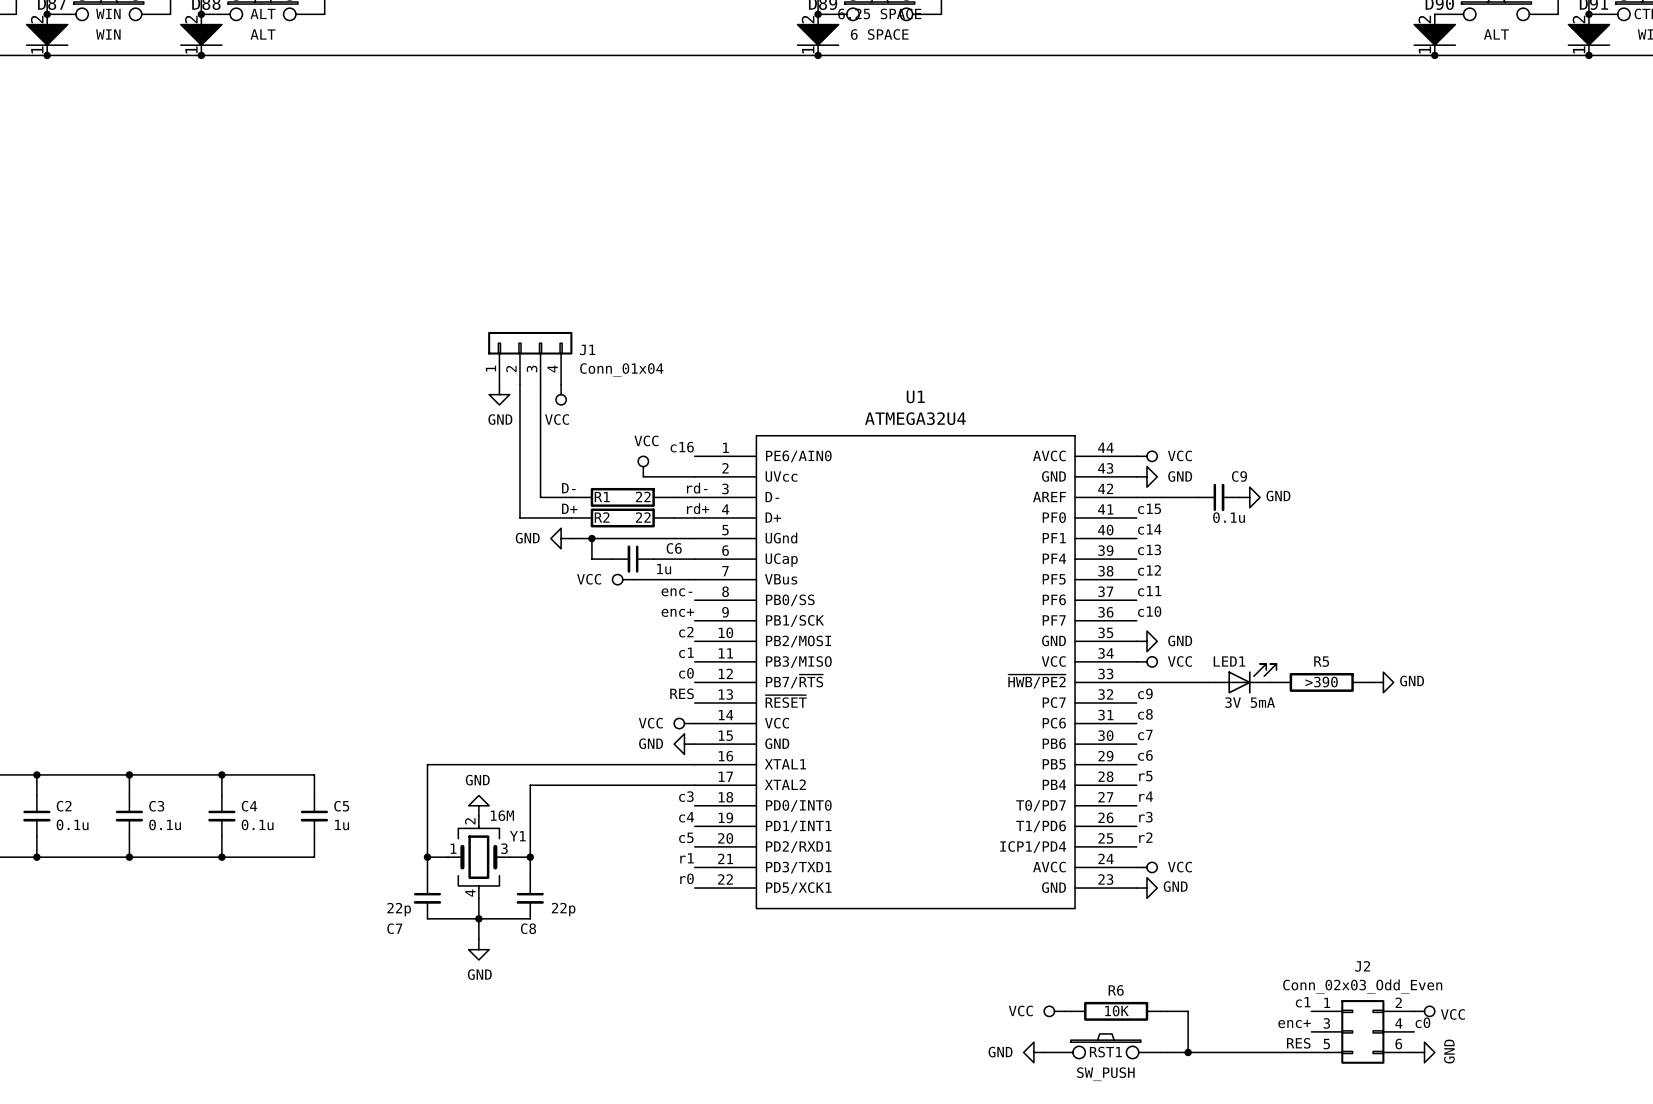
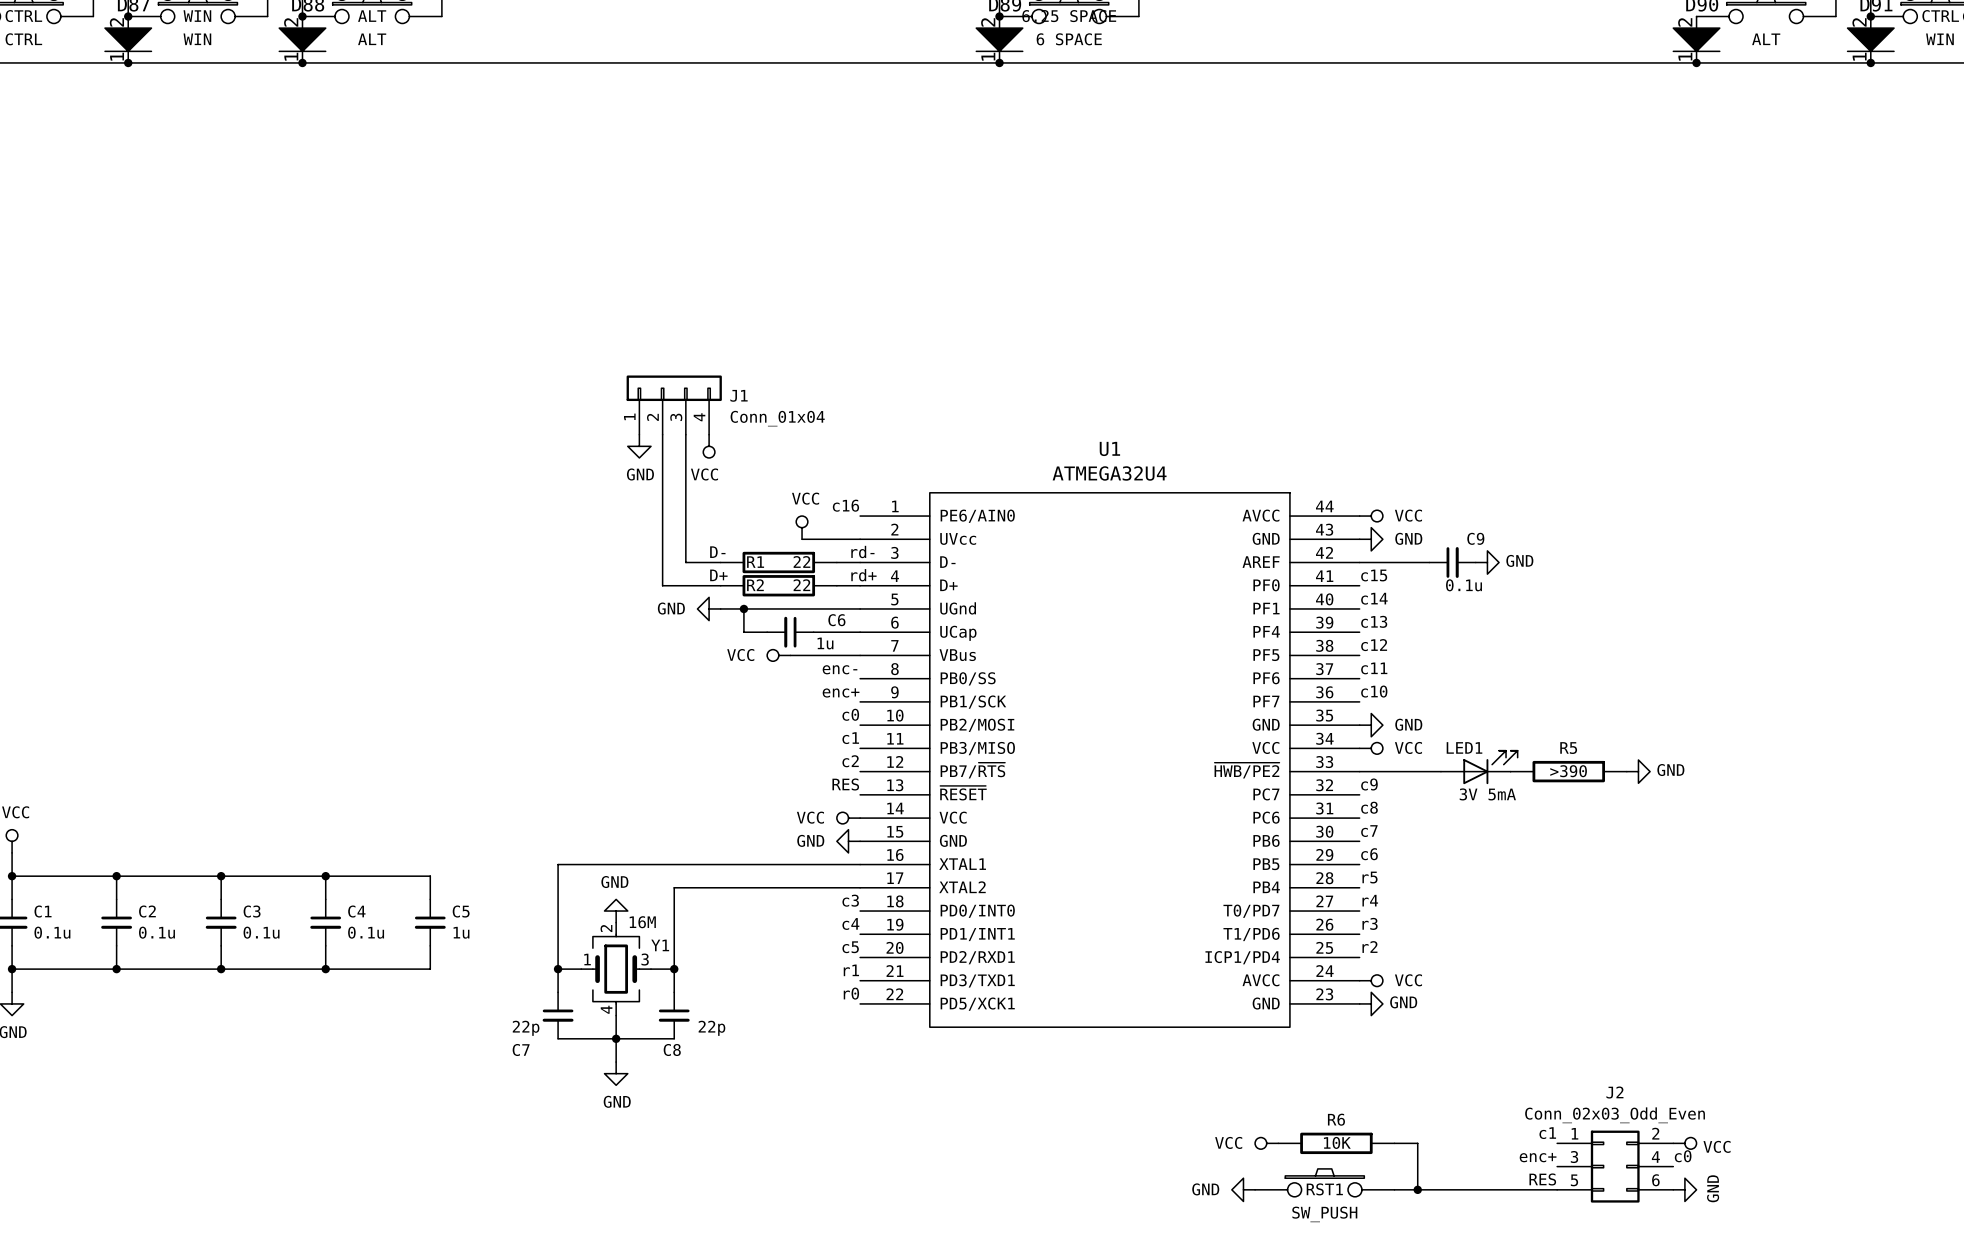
label: c2 (686, 632) -> c0 (850, 714)
label: c0 (686, 673) -> c2 (850, 761)

